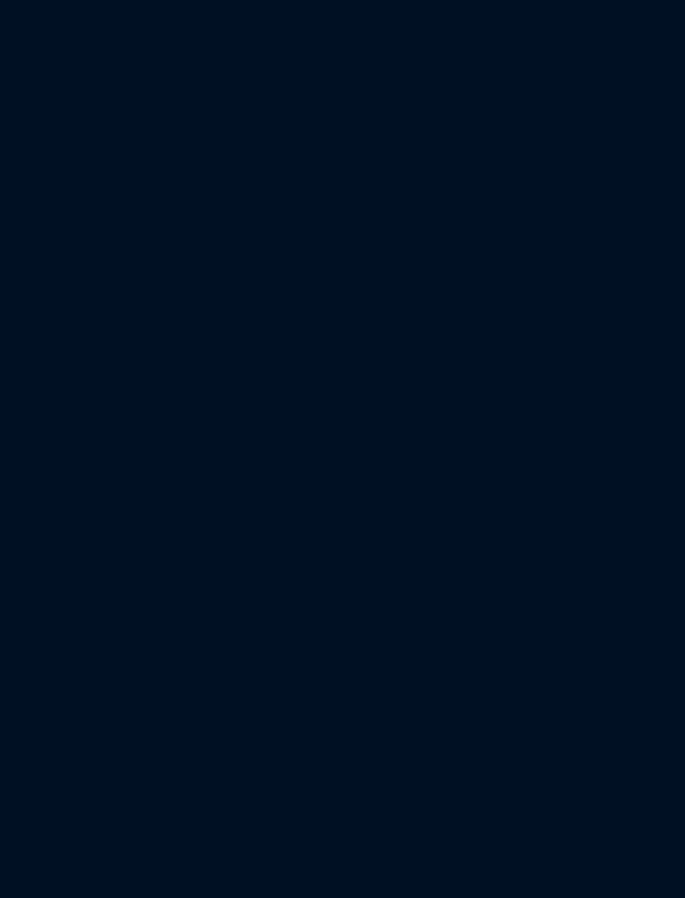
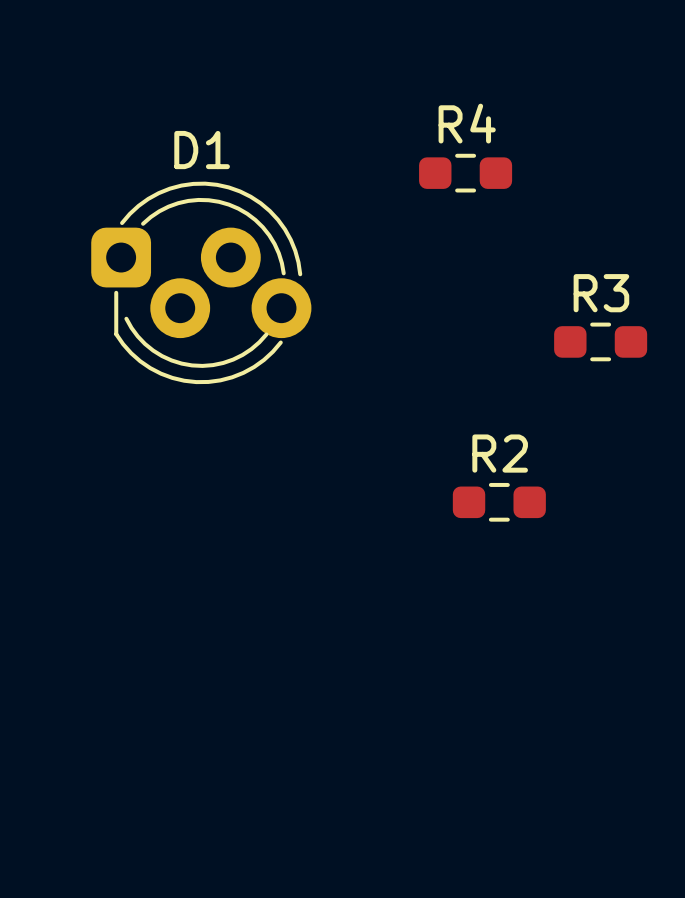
R4: none -> (465, 173)
D1: none -> (201, 282)
R3: none -> (600, 341)
R2: none -> (499, 502)

